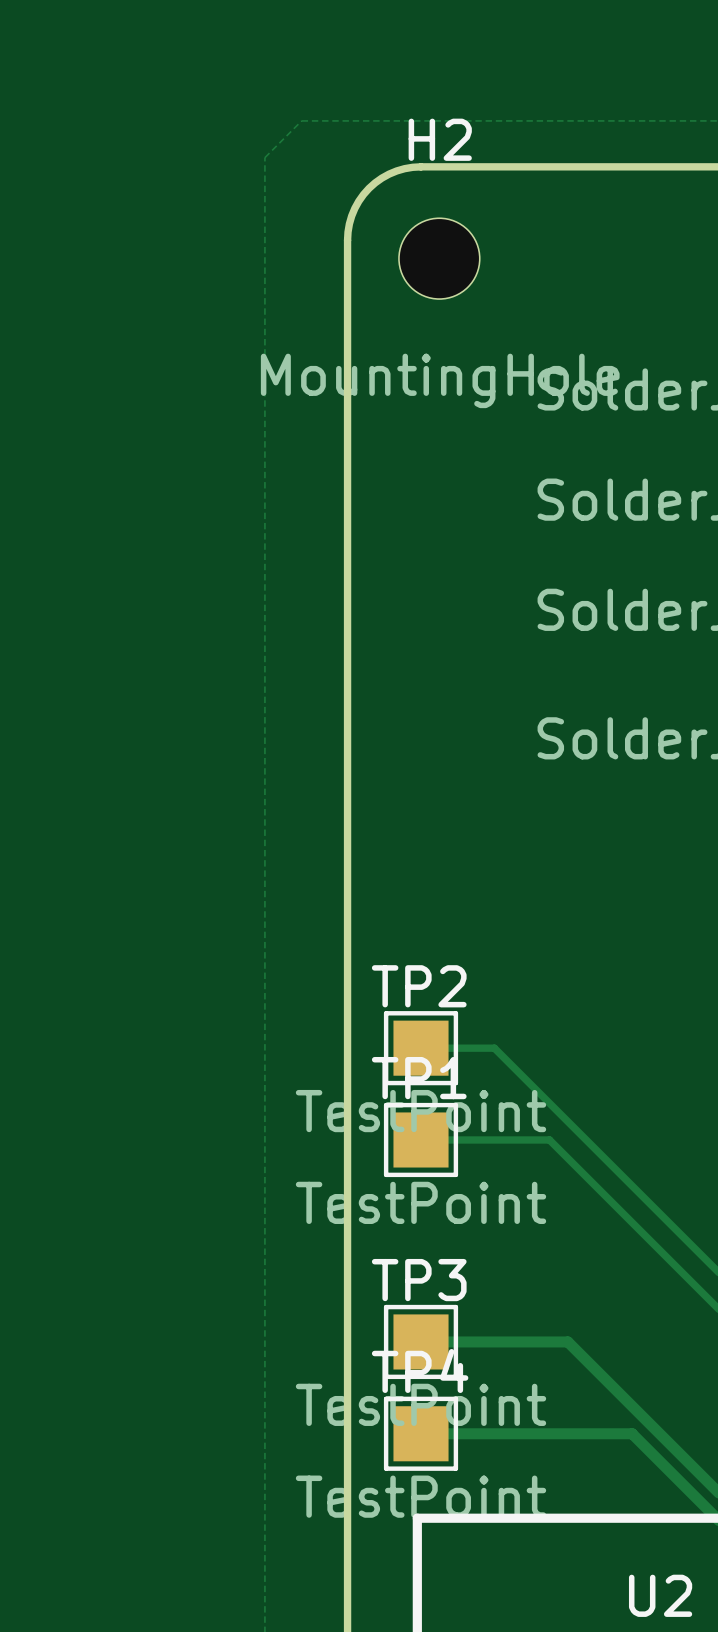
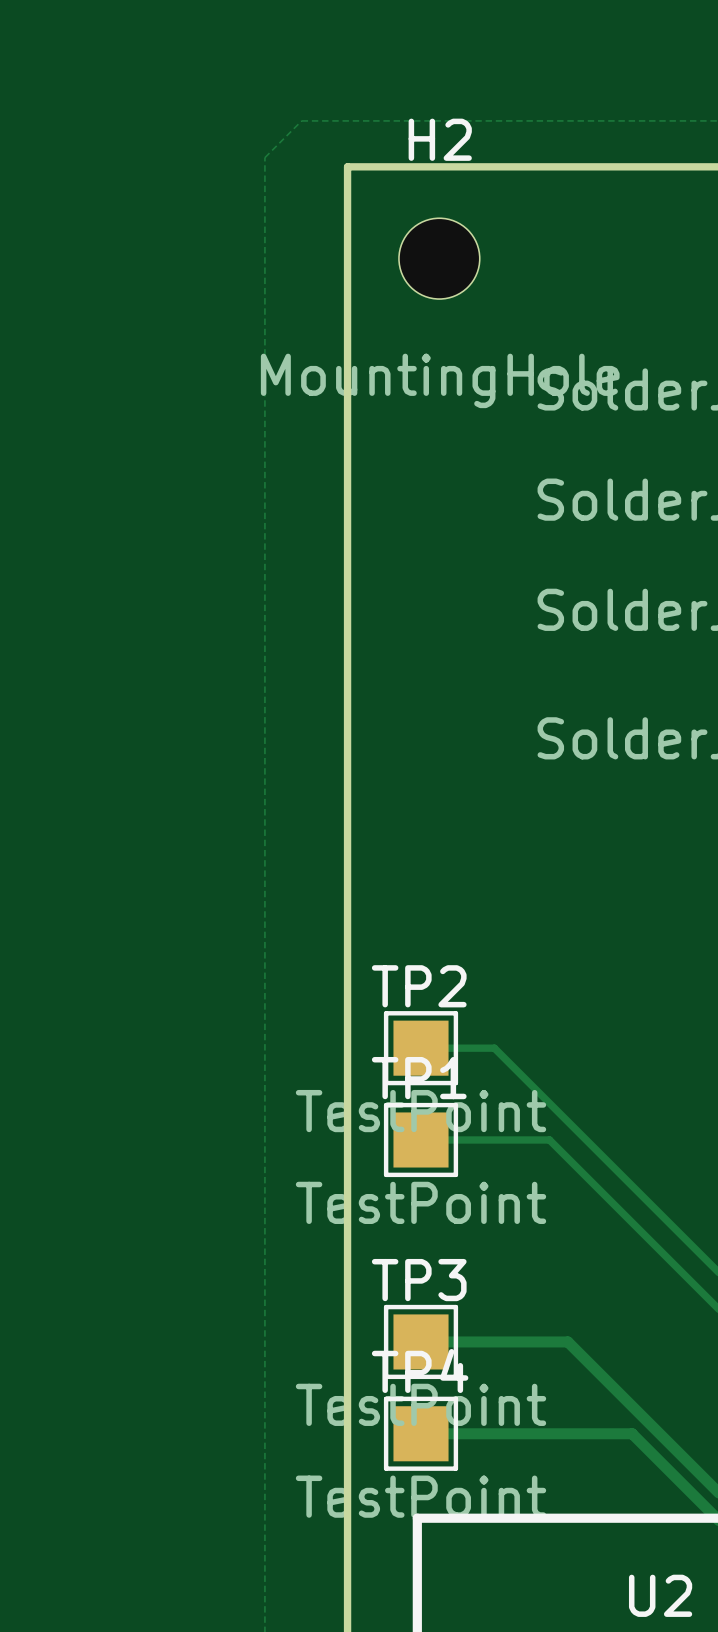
board edge: (421, 166) (404, 168) (389, 174) (369, 188) (358, 201) (351, 216) (347, 240) -> (421, 166) (347, 166) (347, 240)

